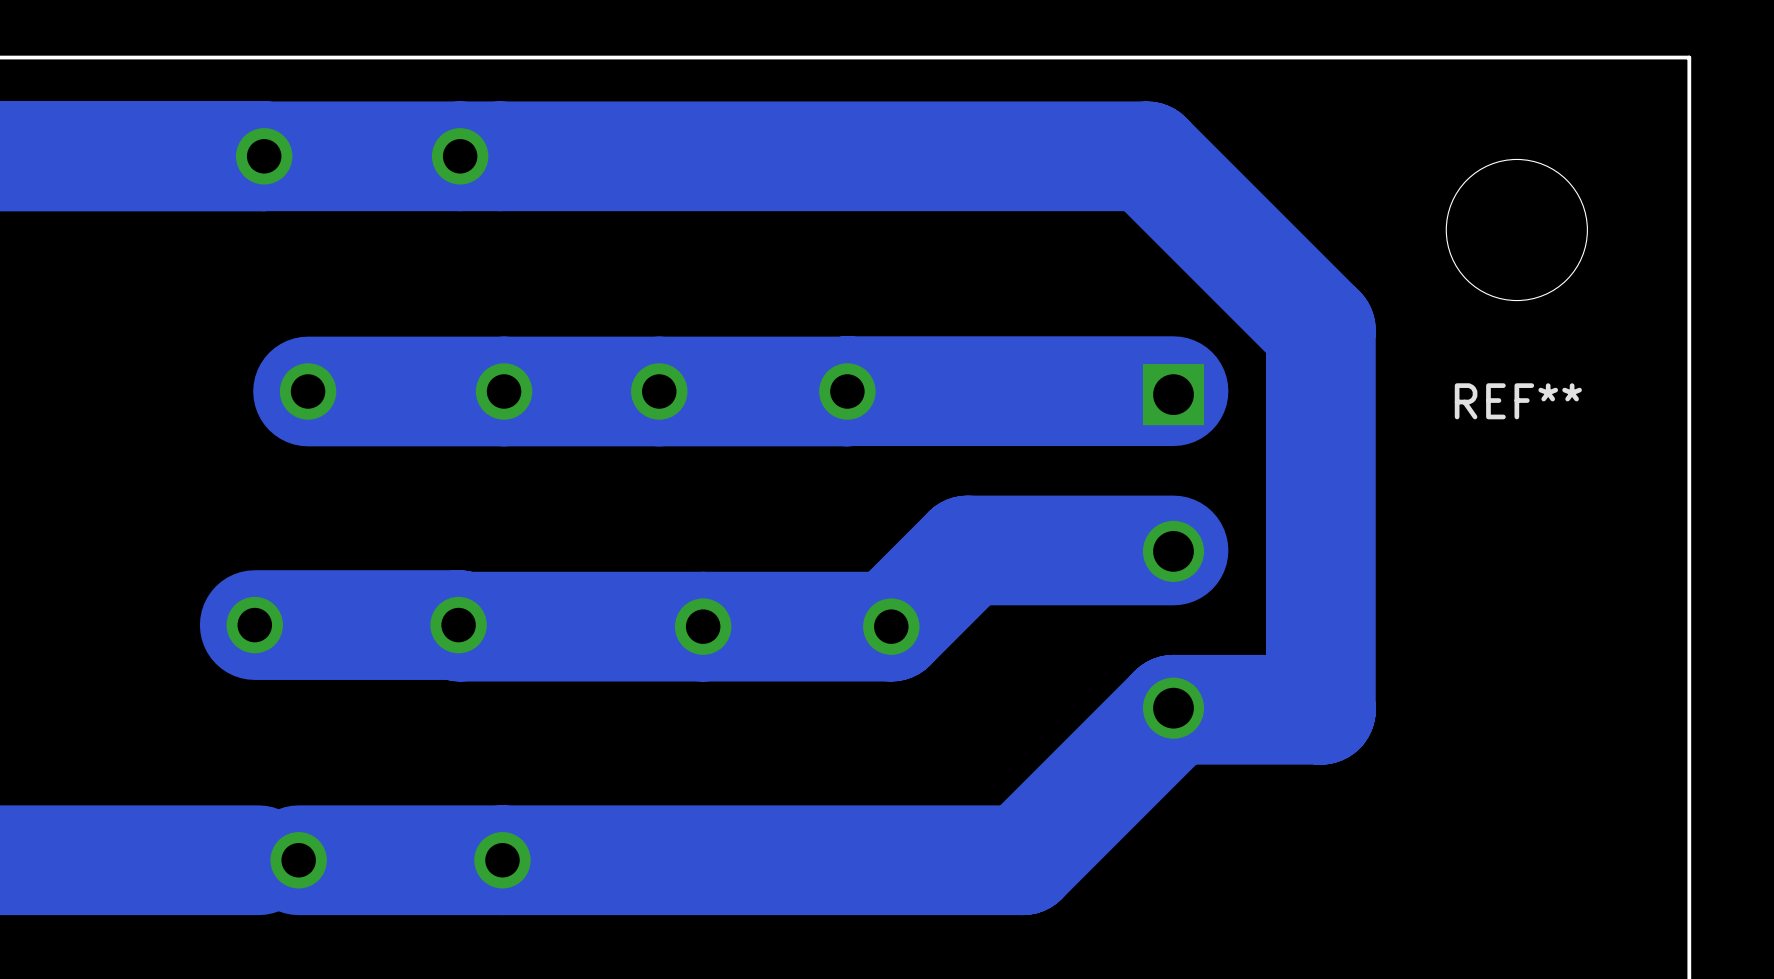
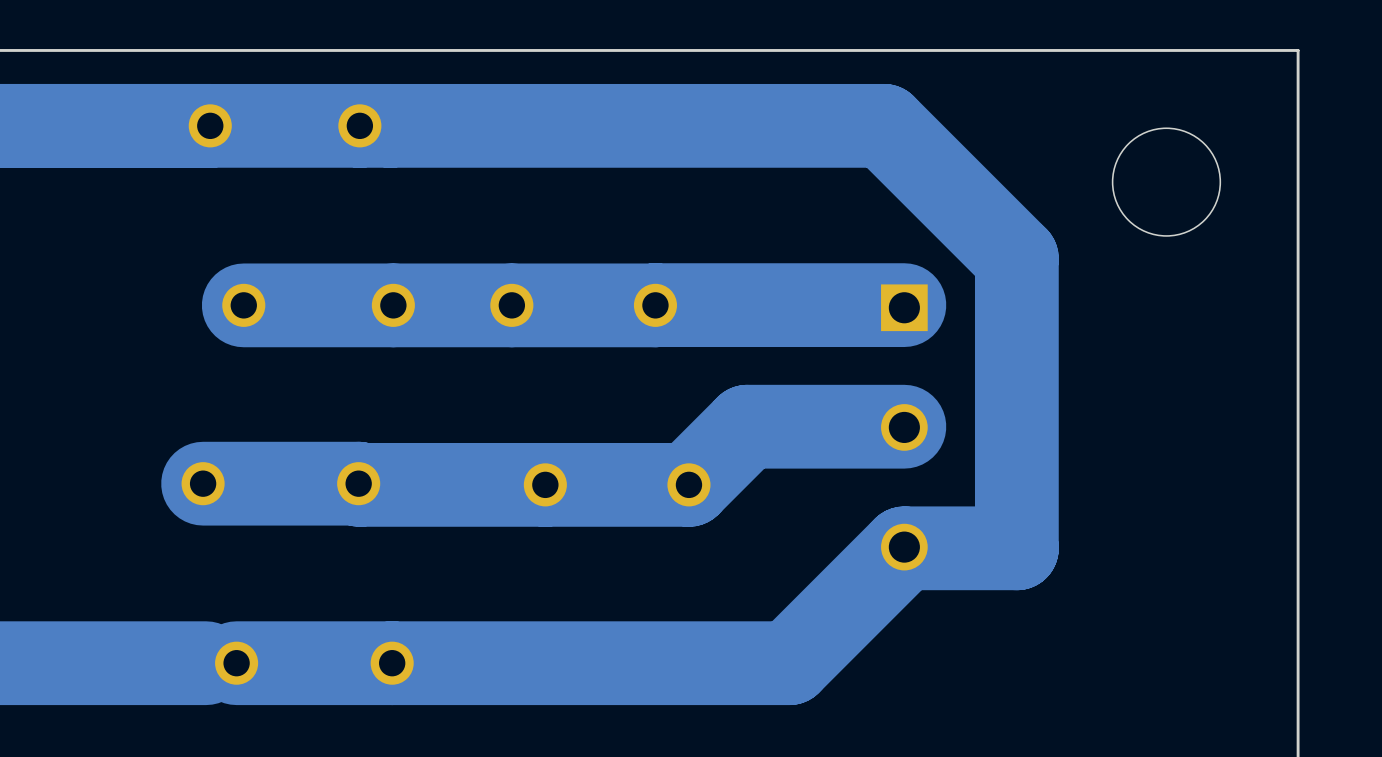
REF** name: REF** (1518, 401) -> none

